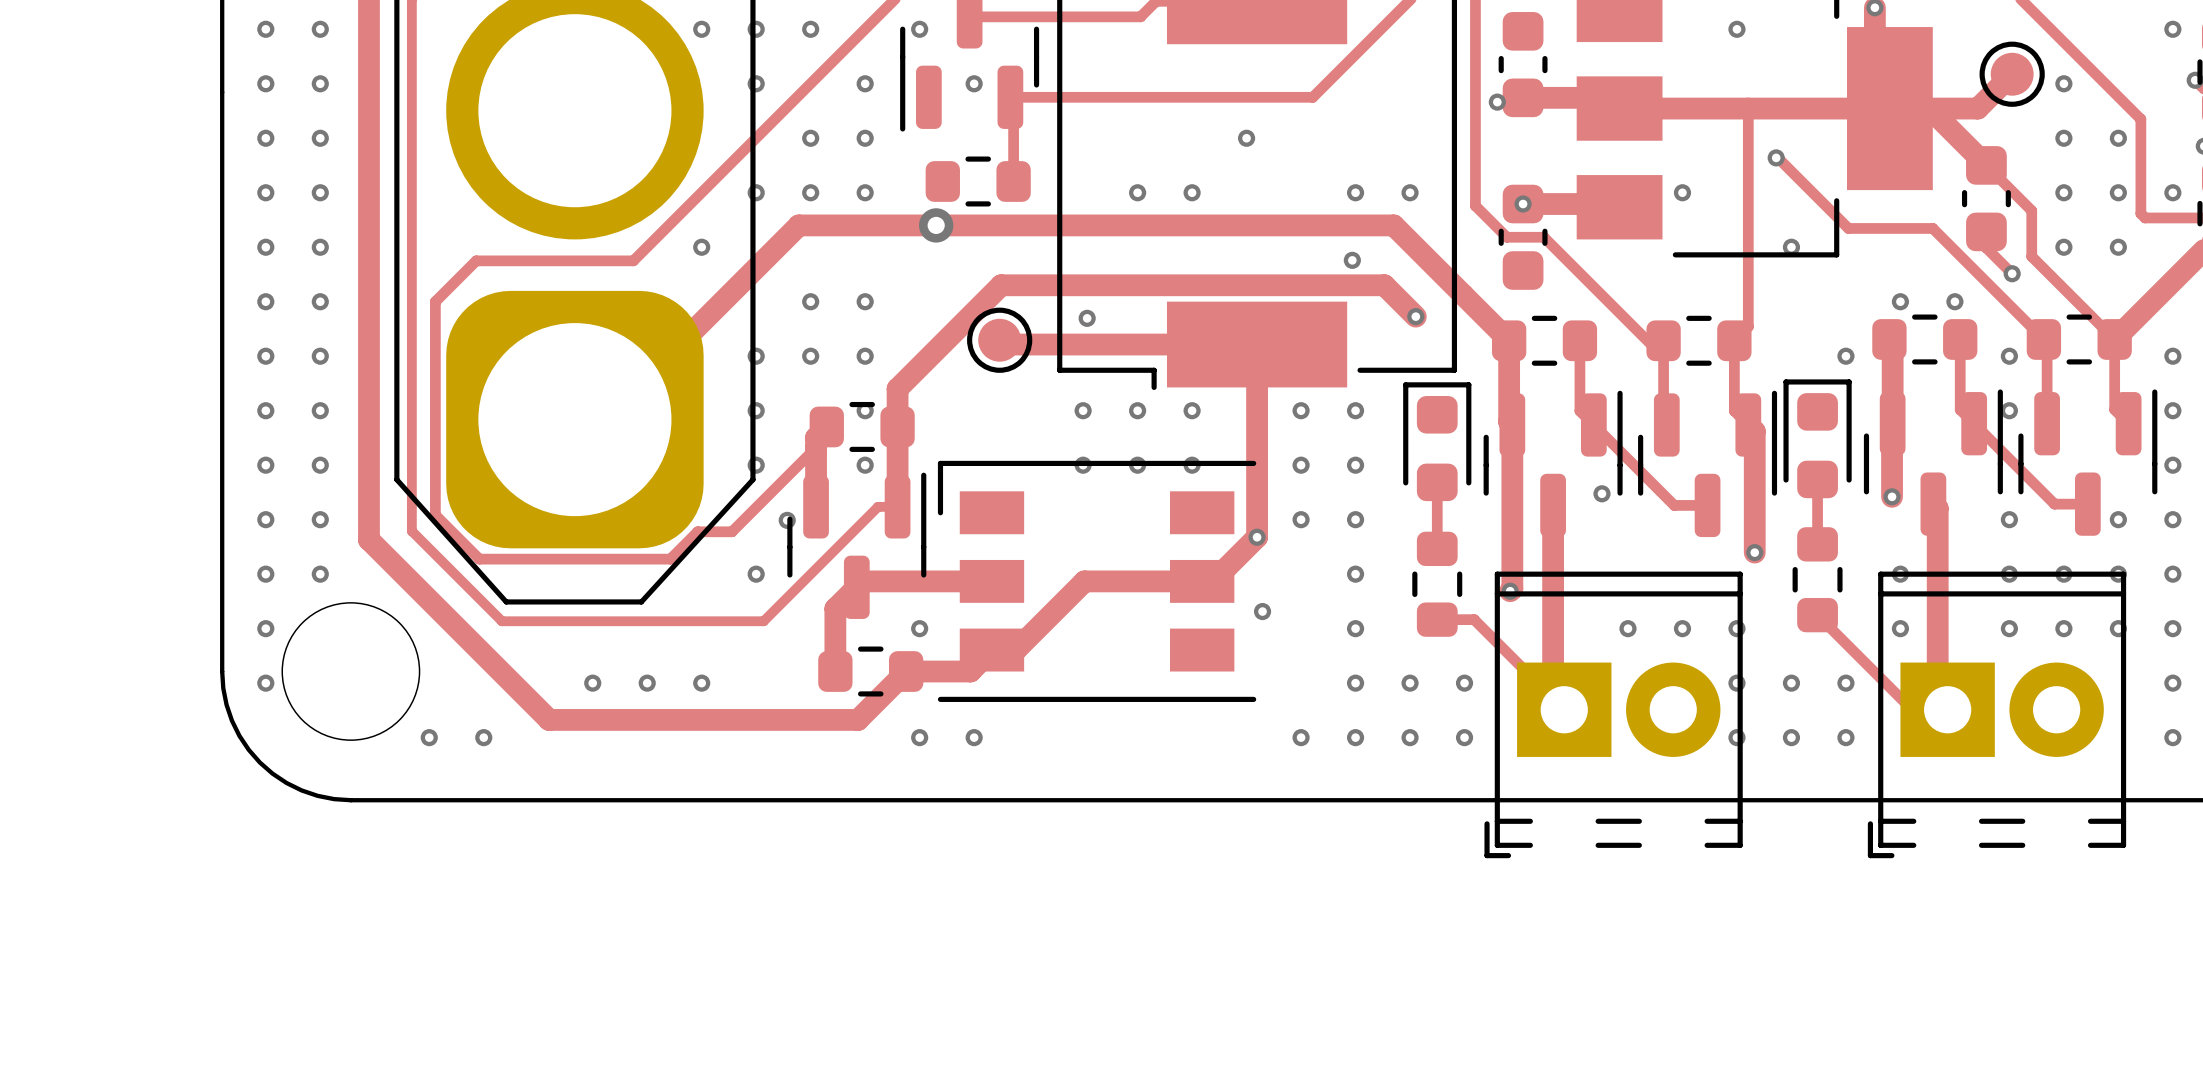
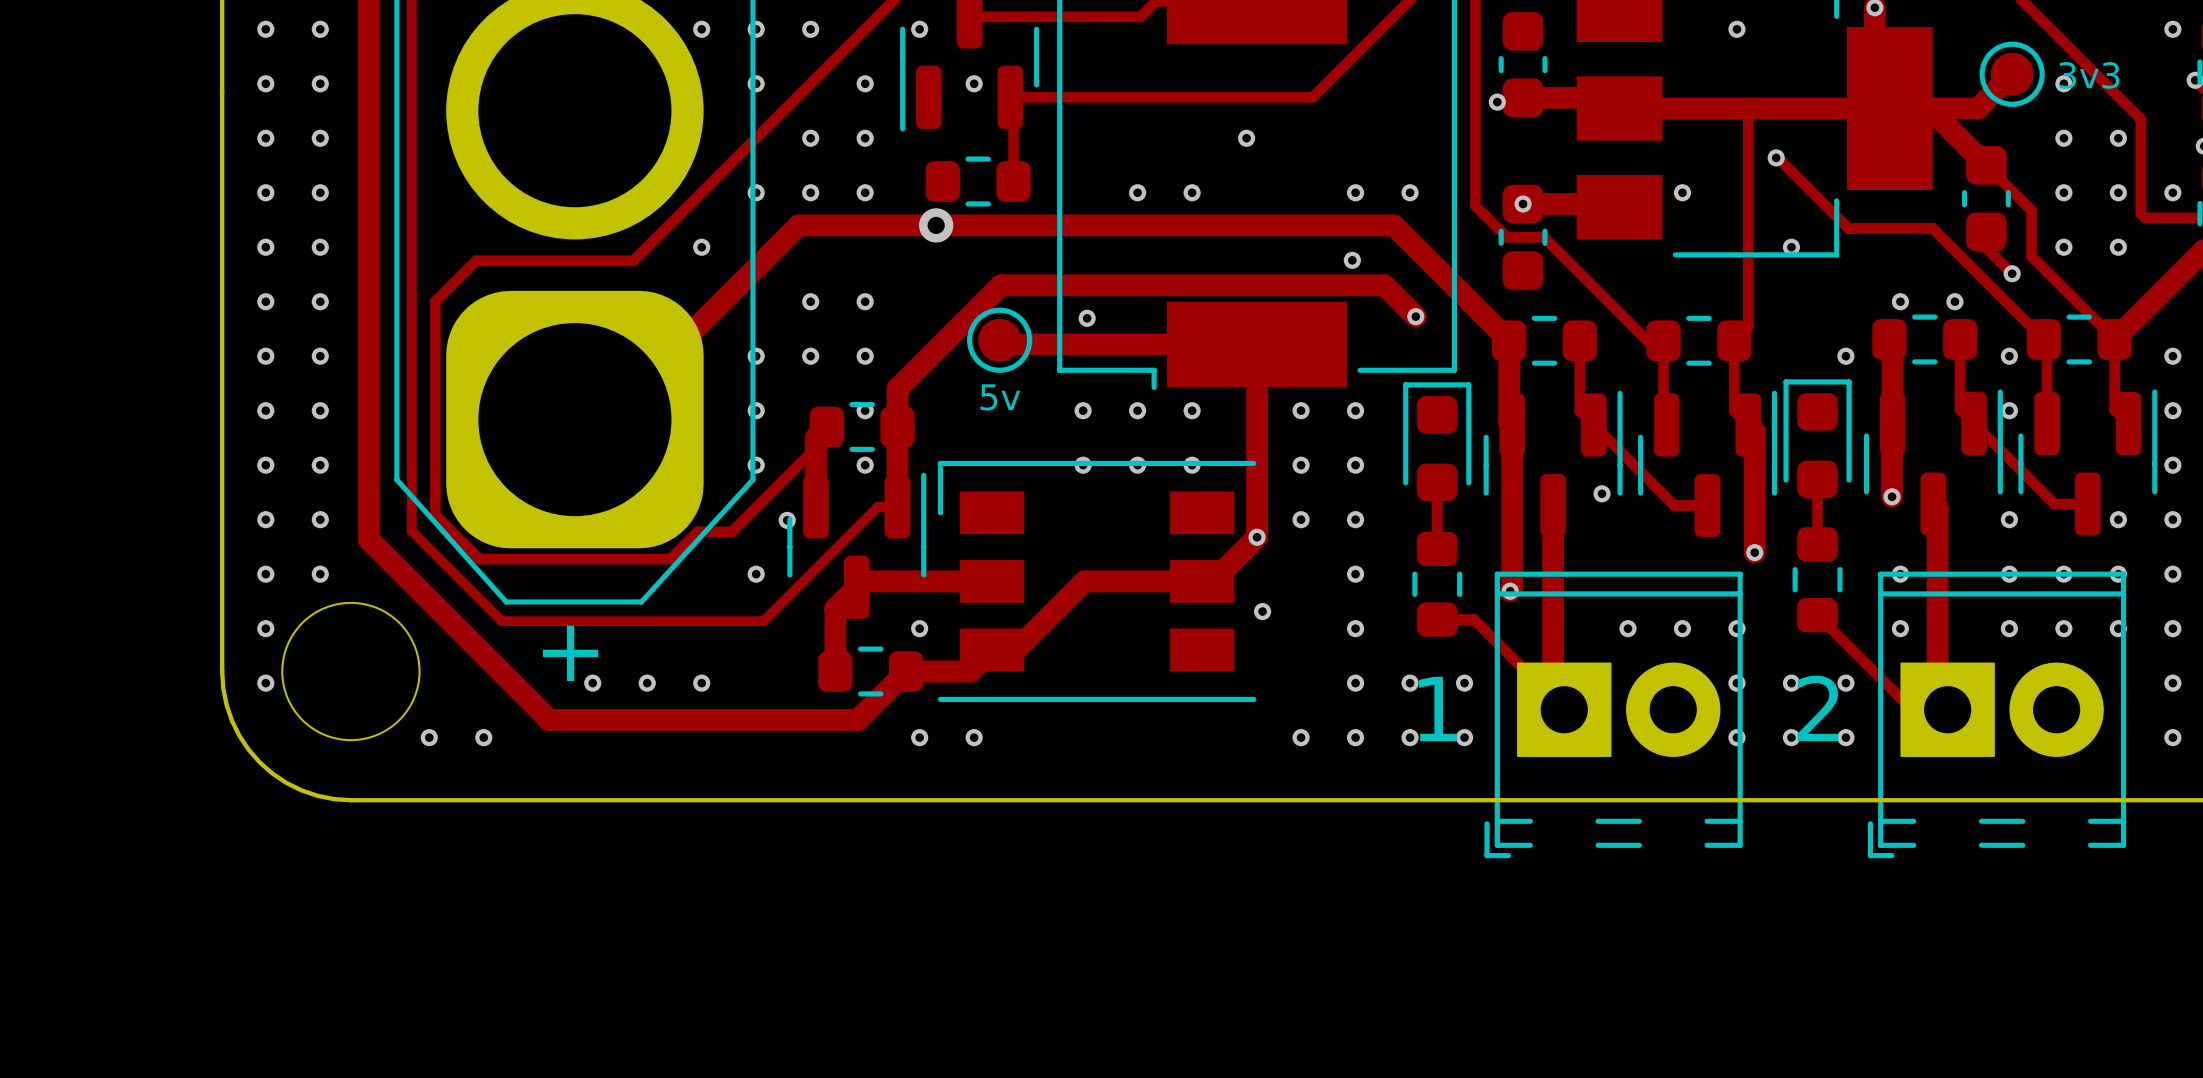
text: none -> 3v3 (2089, 75)
text: none -> 5v (1000, 397)
text: none -> + (570, 653)
text: none -> 1 (1438, 708)
text: none -> 2 (1817, 708)

